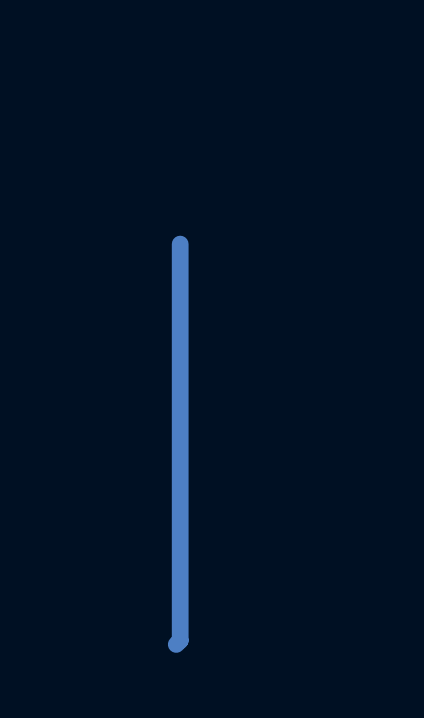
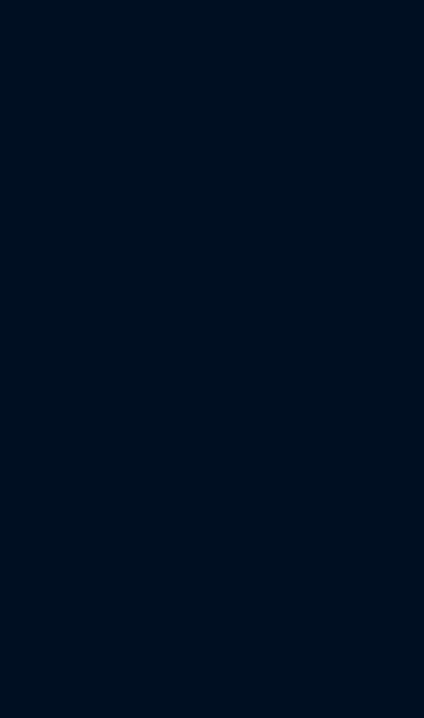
bottom track: (180, 244) (180, 640) (176, 644) -> none

